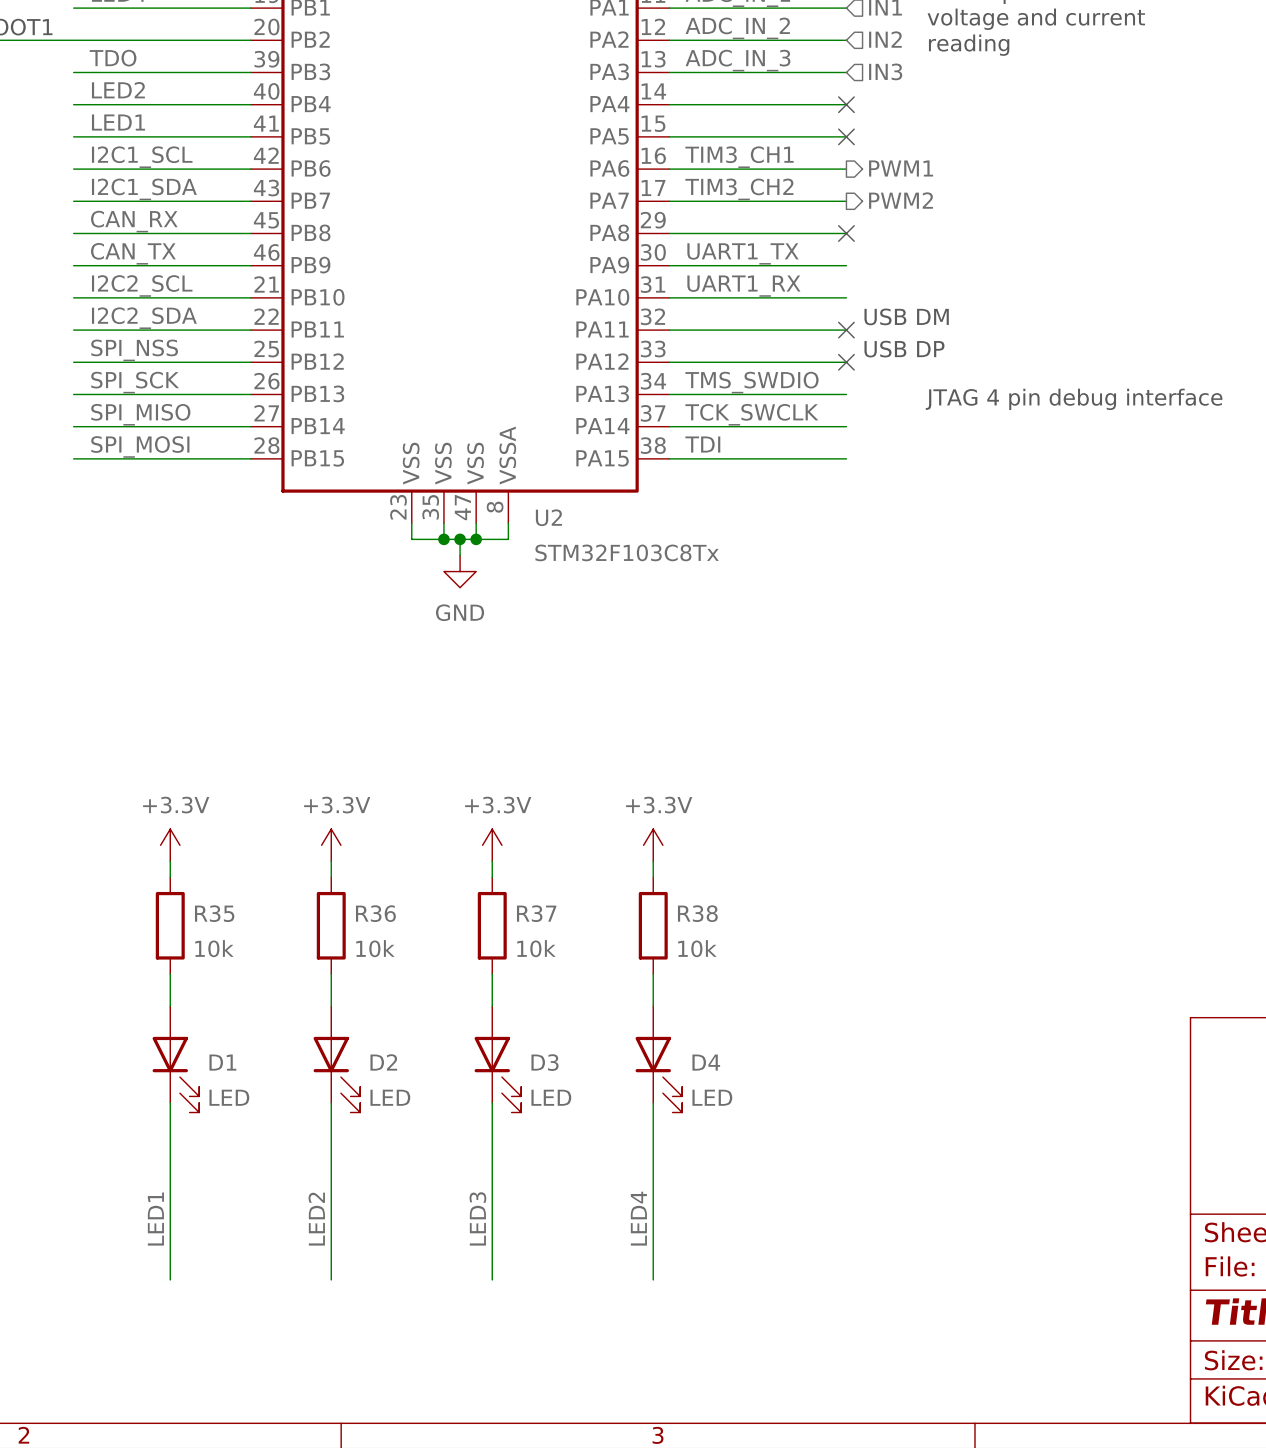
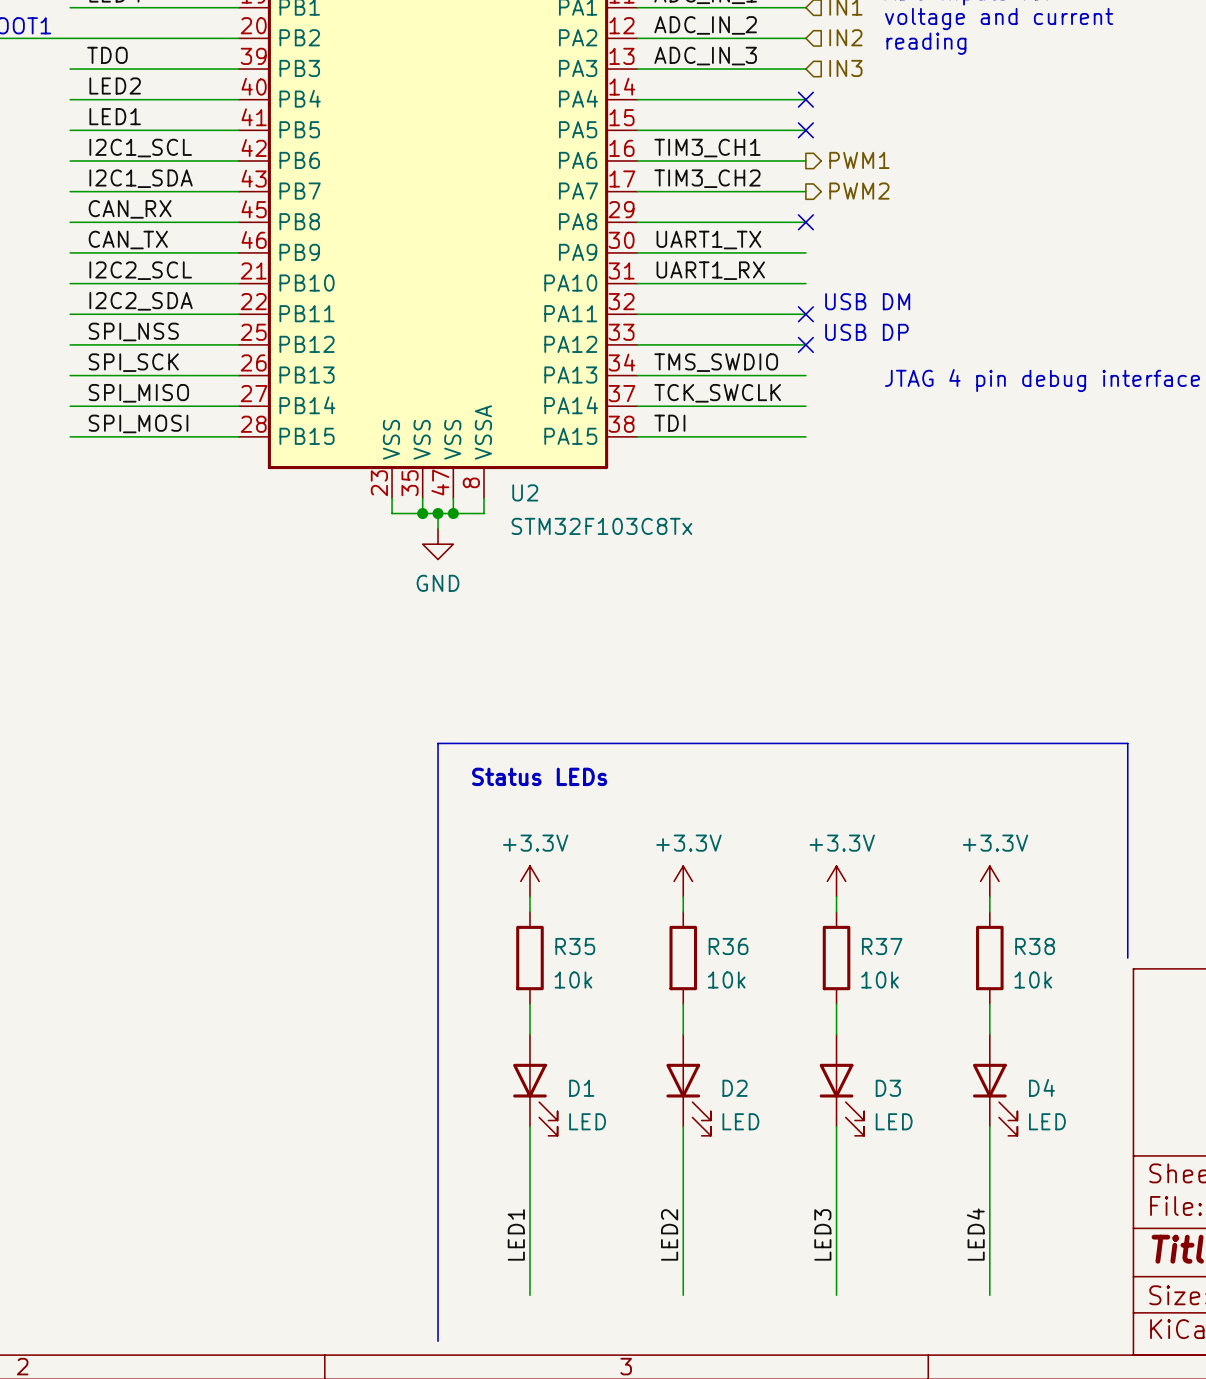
text: none -> Status LEDs (539, 776)
power symbol: +3.3V (170, 845) -> none
power symbol: +3.3V (331, 845) -> none
power symbol: +3.3V (492, 845) -> none
power symbol: +3.3V (653, 845) -> none
wire: (170, 861) (170, 877) -> none
wire: (331, 861) (331, 877) -> (529, 896) (529, 912)
wire: (492, 861) (492, 877) -> (683, 896) (683, 912)
wire: (653, 861) (653, 877) -> (836, 896) (836, 912)
R35 position: (170, 925) -> (529, 958)
R36 position: (331, 925) -> (683, 958)
R37 position: (492, 925) -> (836, 958)
power symbol: none -> +3.3V (529, 881)
R38 position: (653, 925) -> (989, 958)
power symbol: none -> +3.3V (683, 881)
power symbol: none -> +3.3V (836, 881)
power symbol: none -> +3.3V (989, 881)
wire: none -> (989, 896) (989, 912)
wire: (170, 974) (170, 1006) -> none
wire: (331, 974) (331, 1006) -> (529, 1004) (529, 1034)
wire: (492, 974) (492, 1006) -> (683, 1004) (683, 1034)
wire: (653, 974) (653, 1006) -> (836, 1004) (836, 1034)
line: none -> (1127, 958) (1127, 743) (438, 743) (438, 1341)
wire: none -> (989, 1004) (989, 1034)
D1 position: (175, 1059) -> (535, 1085)
D2 position: (336, 1059) -> (688, 1085)
D3 position: (497, 1059) -> (841, 1085)
D4 position: (658, 1059) -> (995, 1085)
wire: (170, 1102) (170, 1279) -> none
wire: (331, 1102) (331, 1279) -> (529, 1126) (529, 1295)
wire: (492, 1102) (492, 1279) -> (683, 1126) (683, 1295)
wire: (653, 1102) (653, 1279) -> (836, 1126) (836, 1295)
wire: none -> (989, 1126) (989, 1295)
label: LED3 (477, 1218) -> none
label: LED4 (638, 1218) -> none
label: LED1 (155, 1219) -> none
label: LED2 (316, 1219) -> none
label: none -> LED1 (516, 1234)
label: none -> LED2 (669, 1234)
label: none -> LED3 (822, 1234)
label: none -> LED4 (975, 1234)

